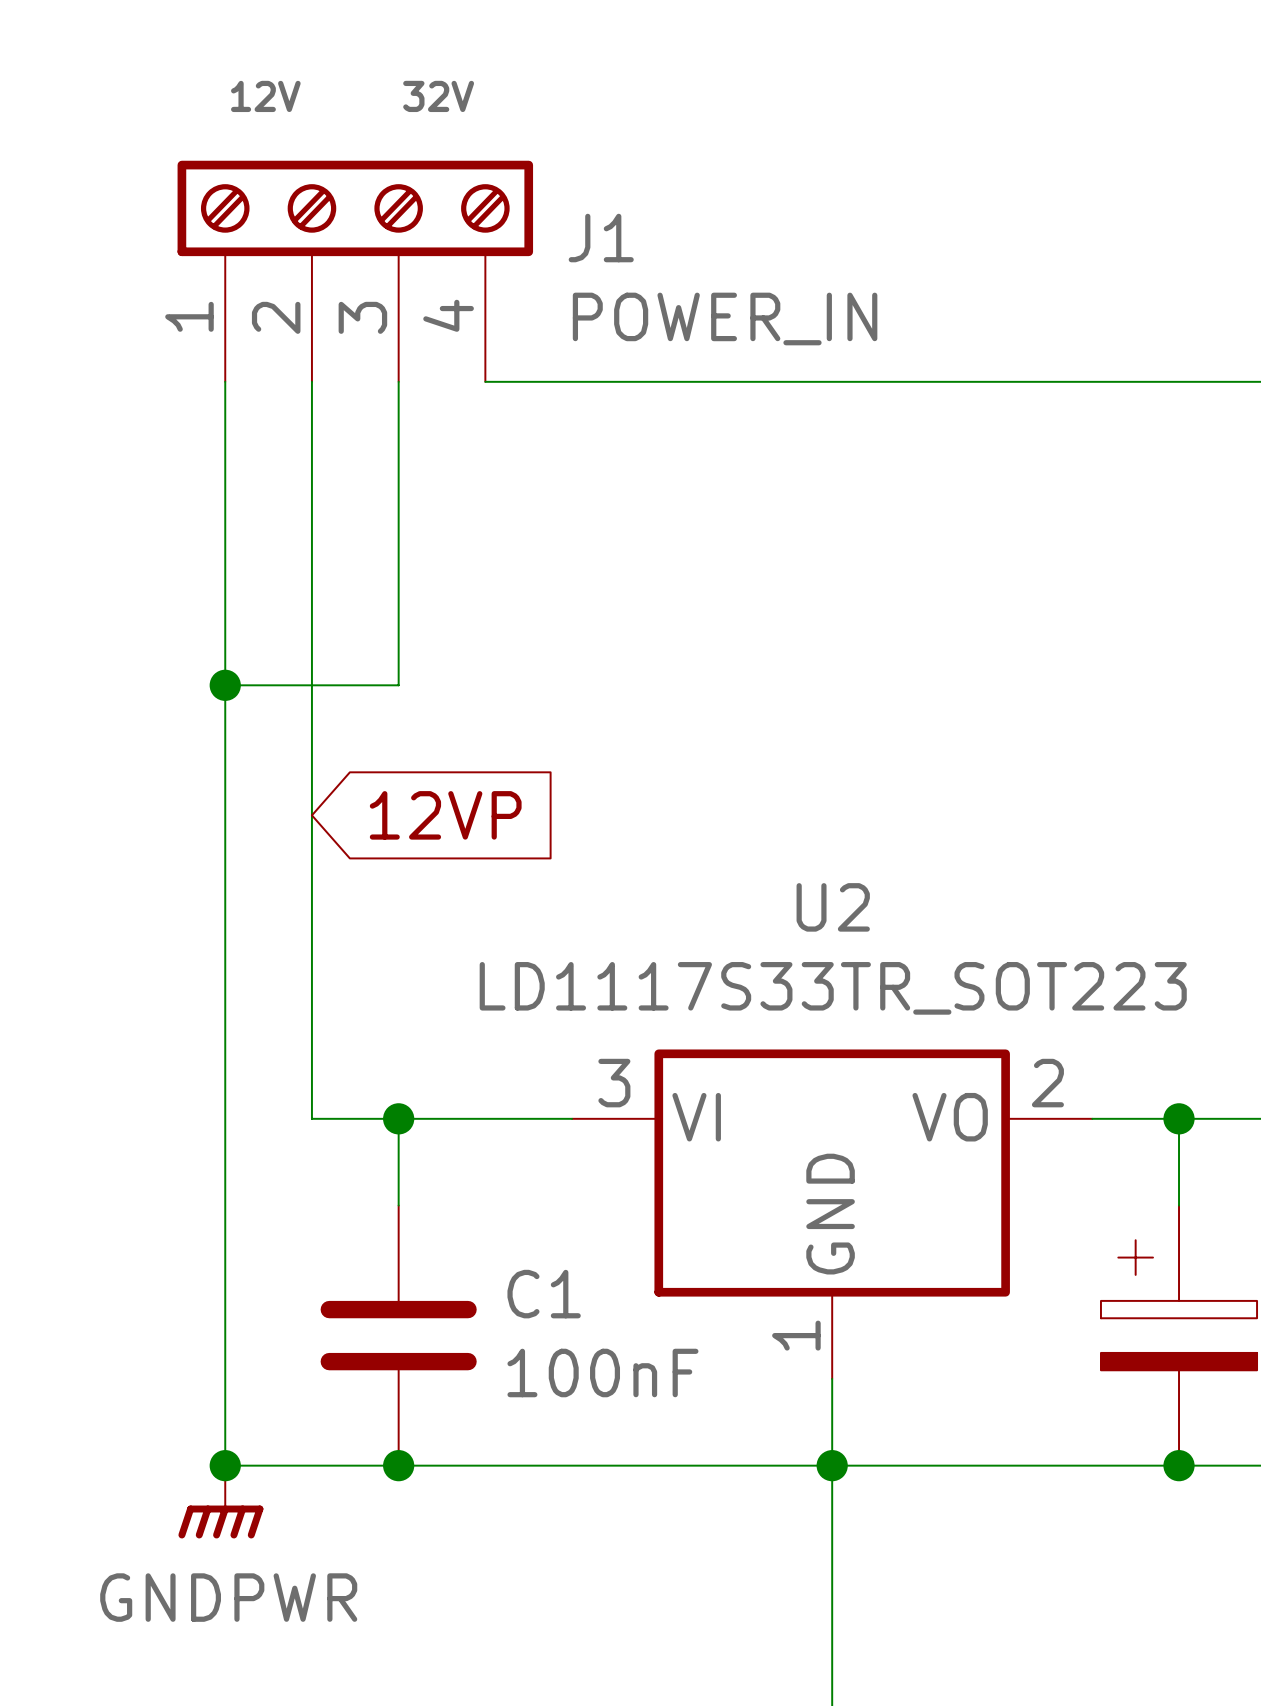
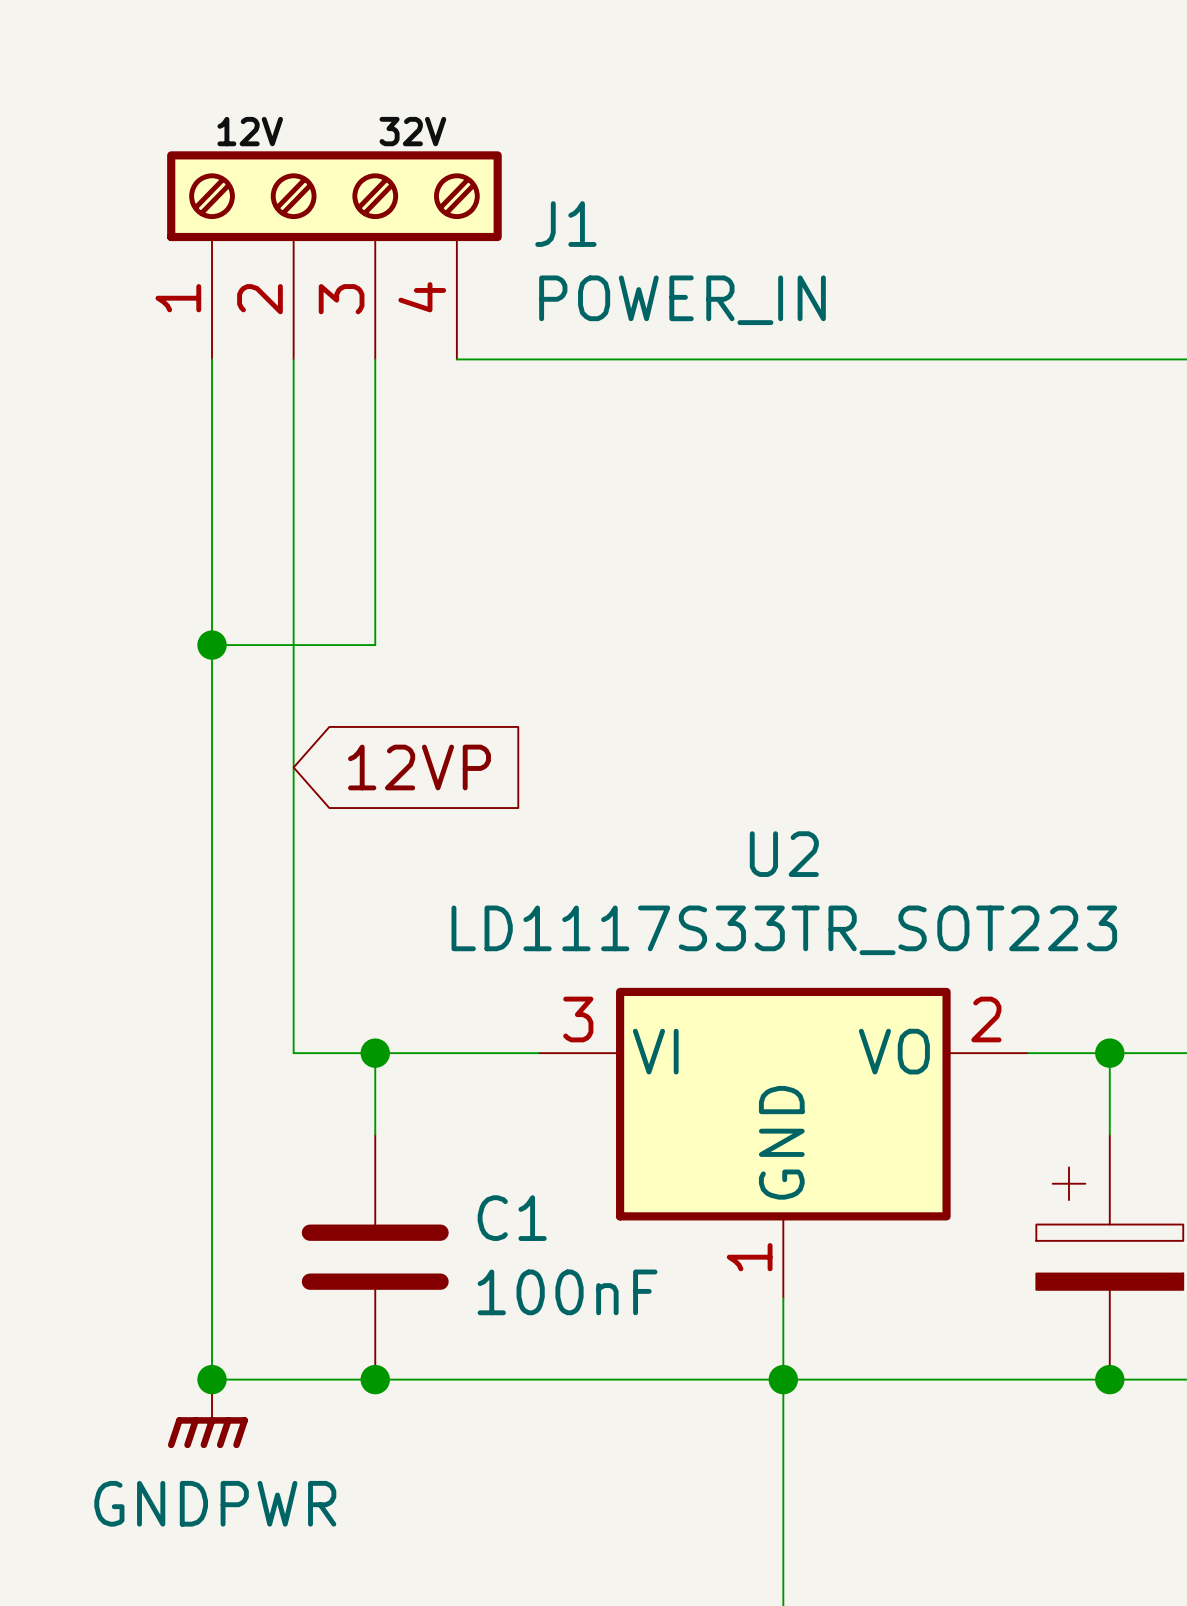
label position: 12V (265, 96) -> 12V (250, 131)
label position: 32V (438, 96) -> 32V (412, 131)

